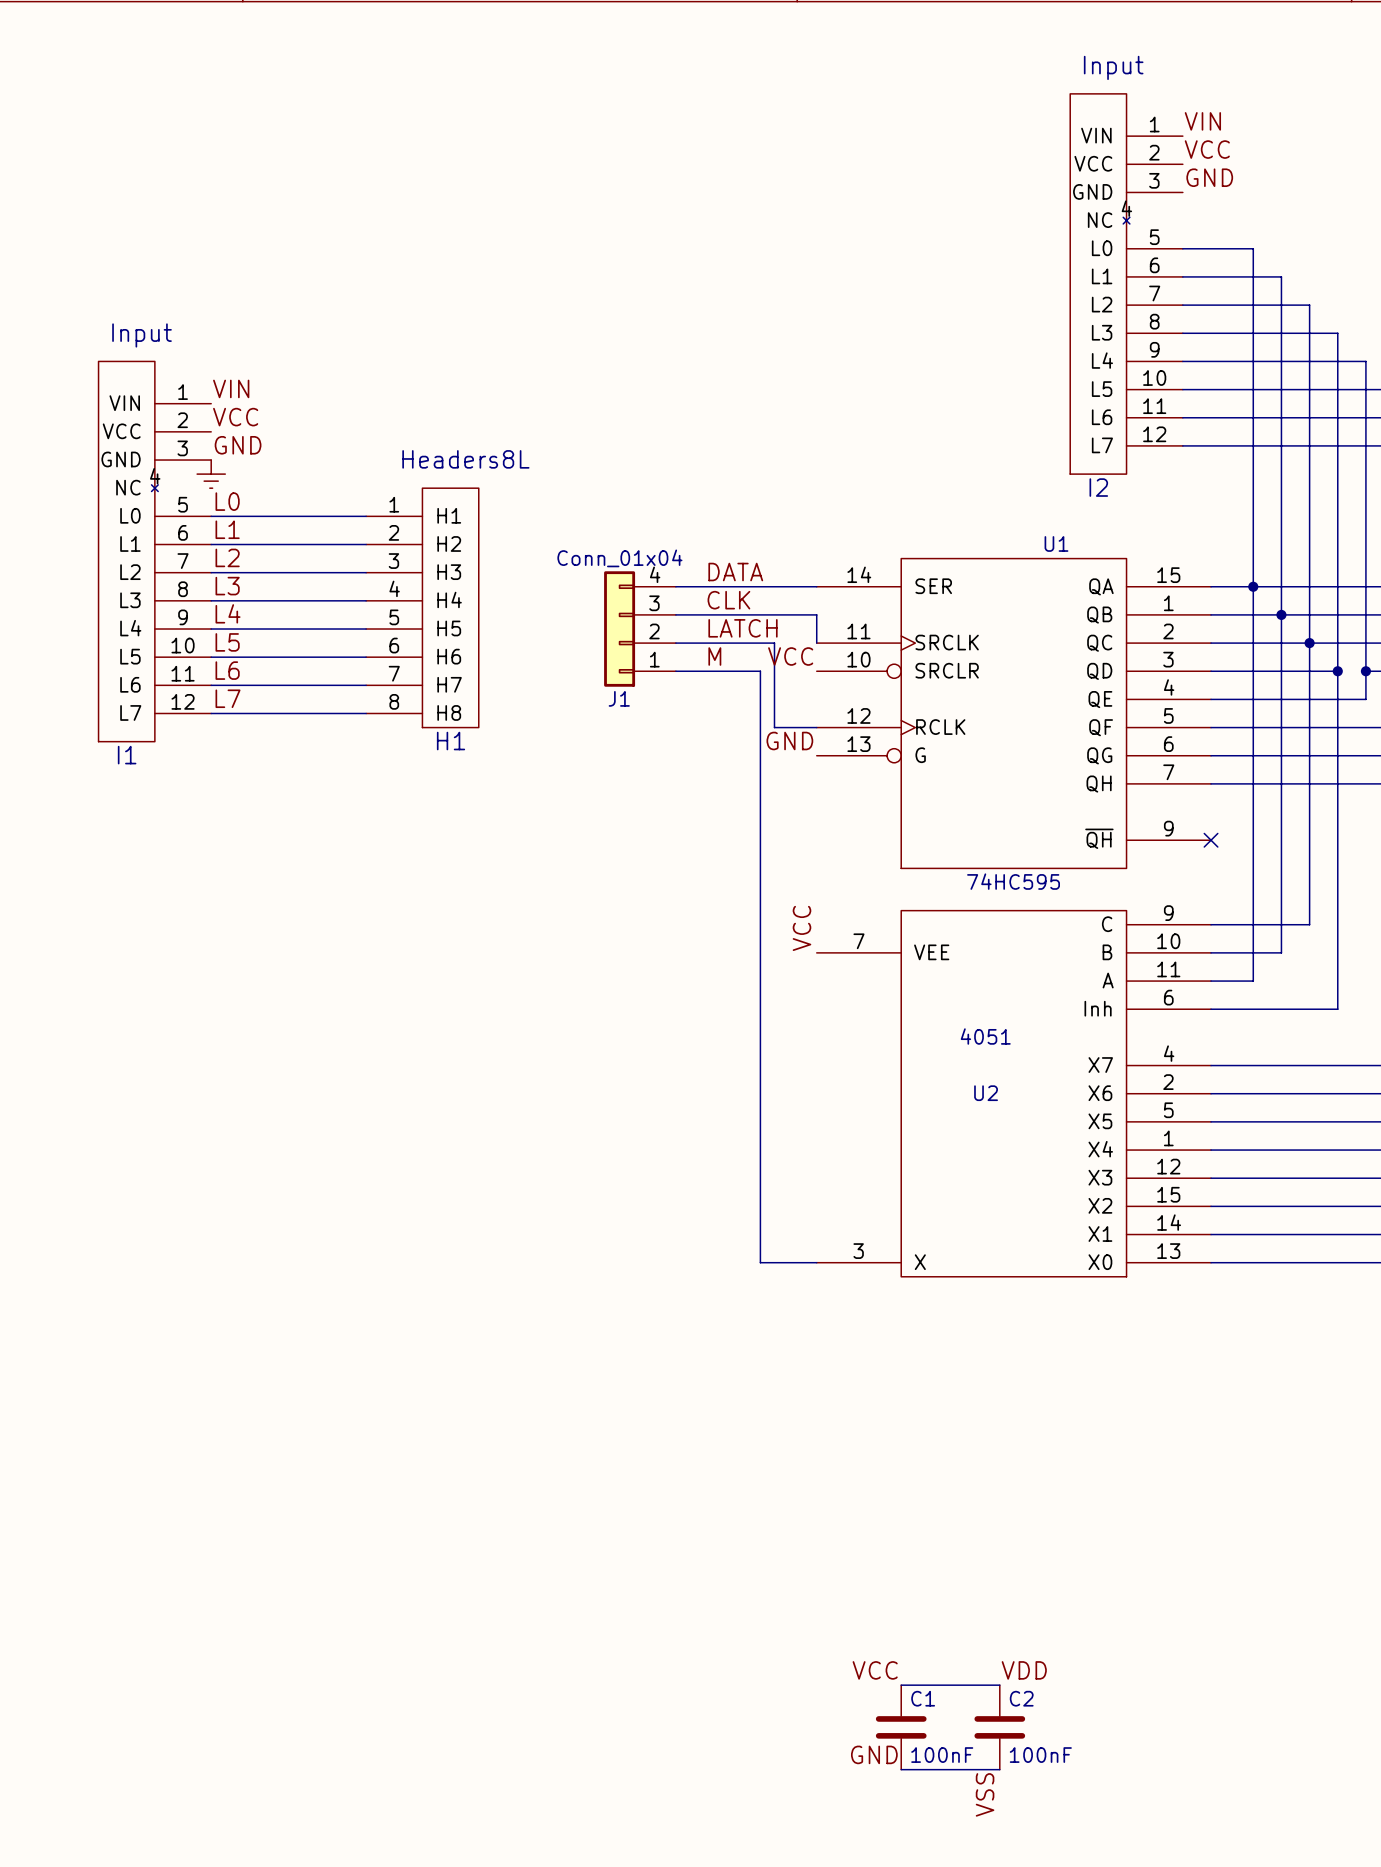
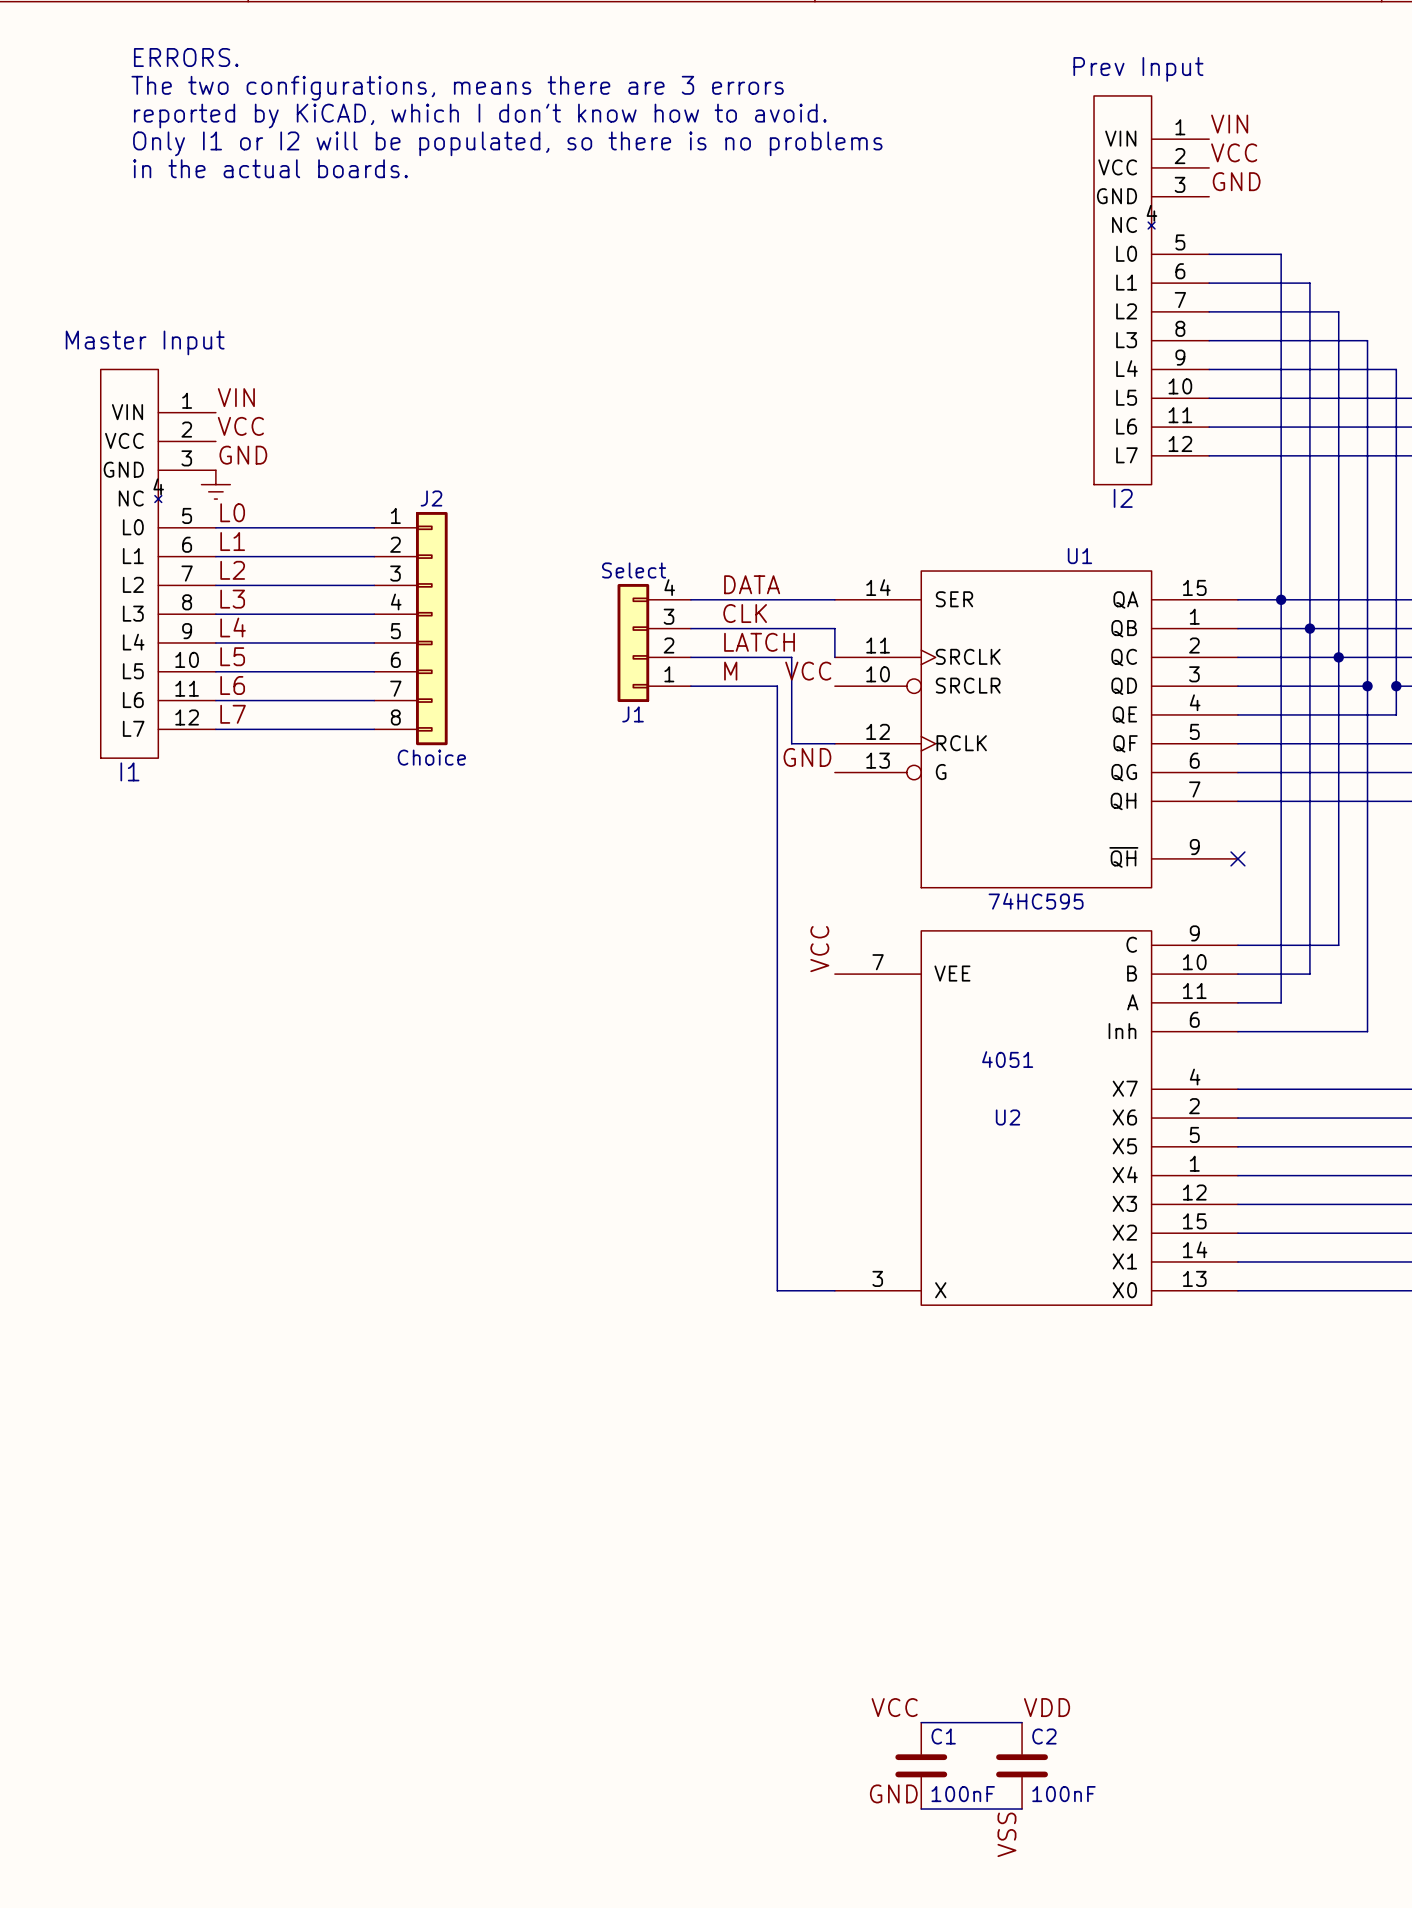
text: none -> ERRORS. (186, 57)
I2 value: Input (1113, 67) -> Prev Input (1138, 69)
text: none -> The two configurations, means there are 3 errors (457, 88)
text: none -> reported by KiCAD, which I don't know how to avoid. (480, 116)
text: none -> Only I1 or I2 will be populated, so there is no problems (507, 143)
text: none -> in the actual boards. (270, 168)
I1 value: Input (142, 335) -> Master Input (145, 342)
J1 value: Conn_01x04 (619, 558) -> Select (634, 570)
H1: Headers8L (422, 607) -> none
J2: none -> Choice (410, 628)

